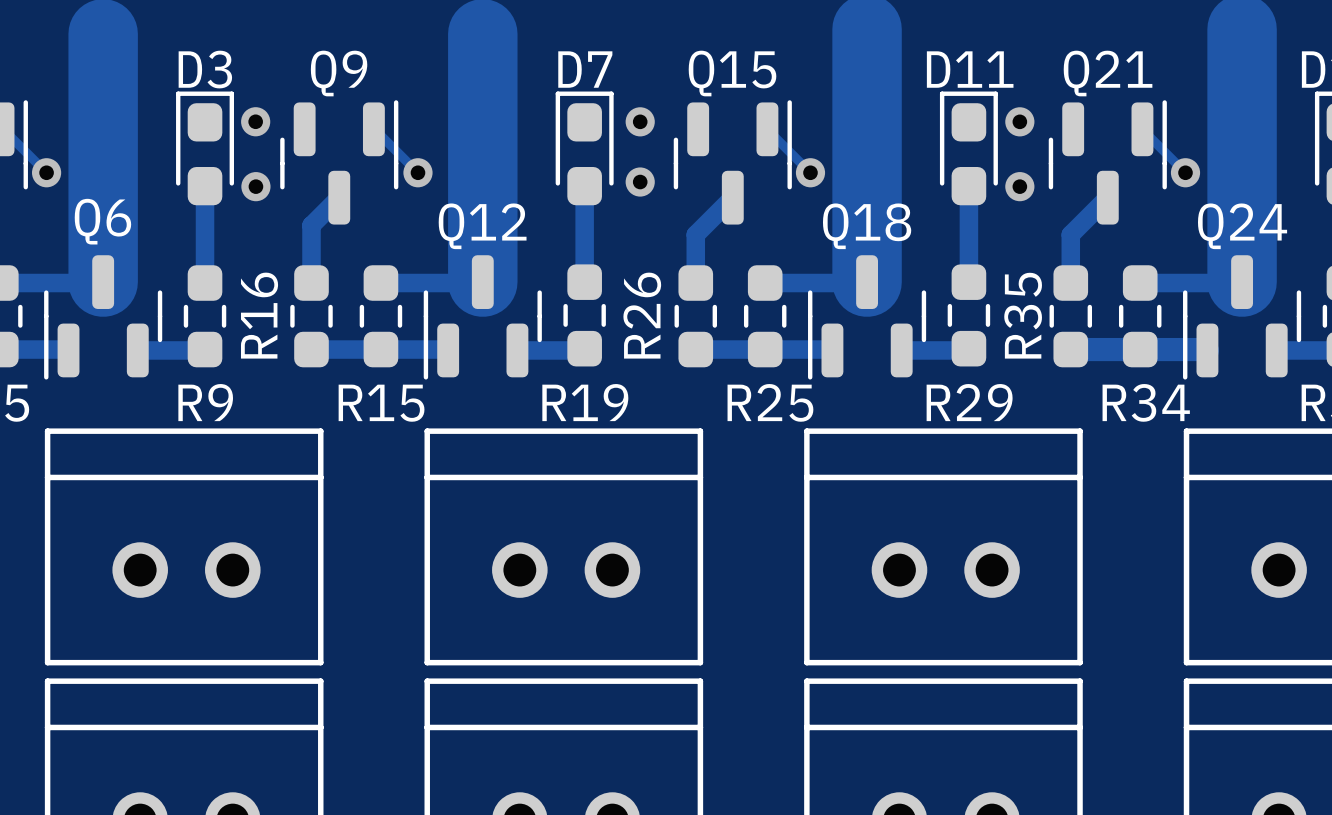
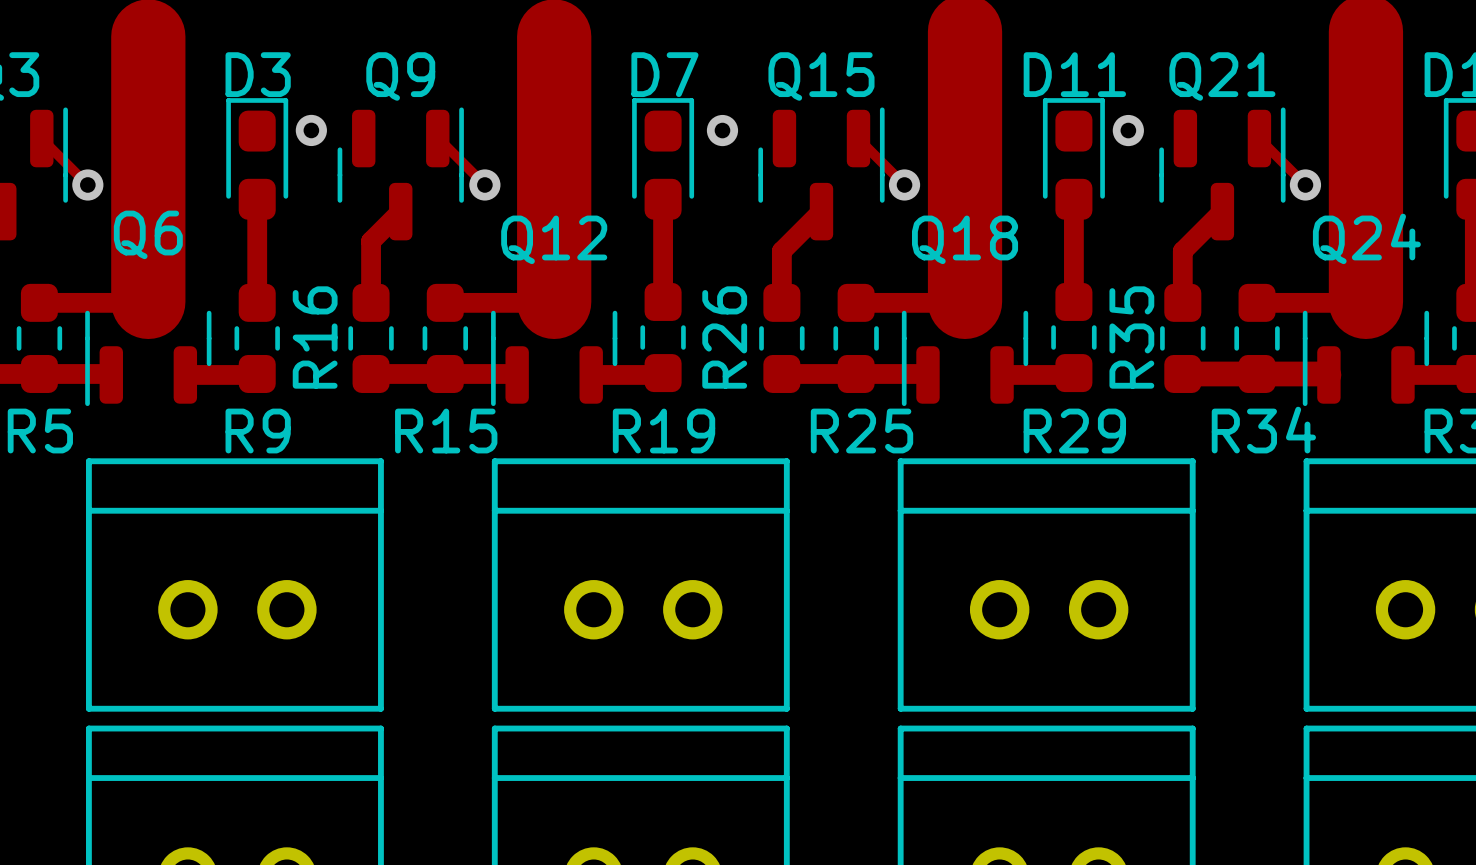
via: (640, 182) -> none
via: (255, 186) -> none
via: (1019, 186) -> none

